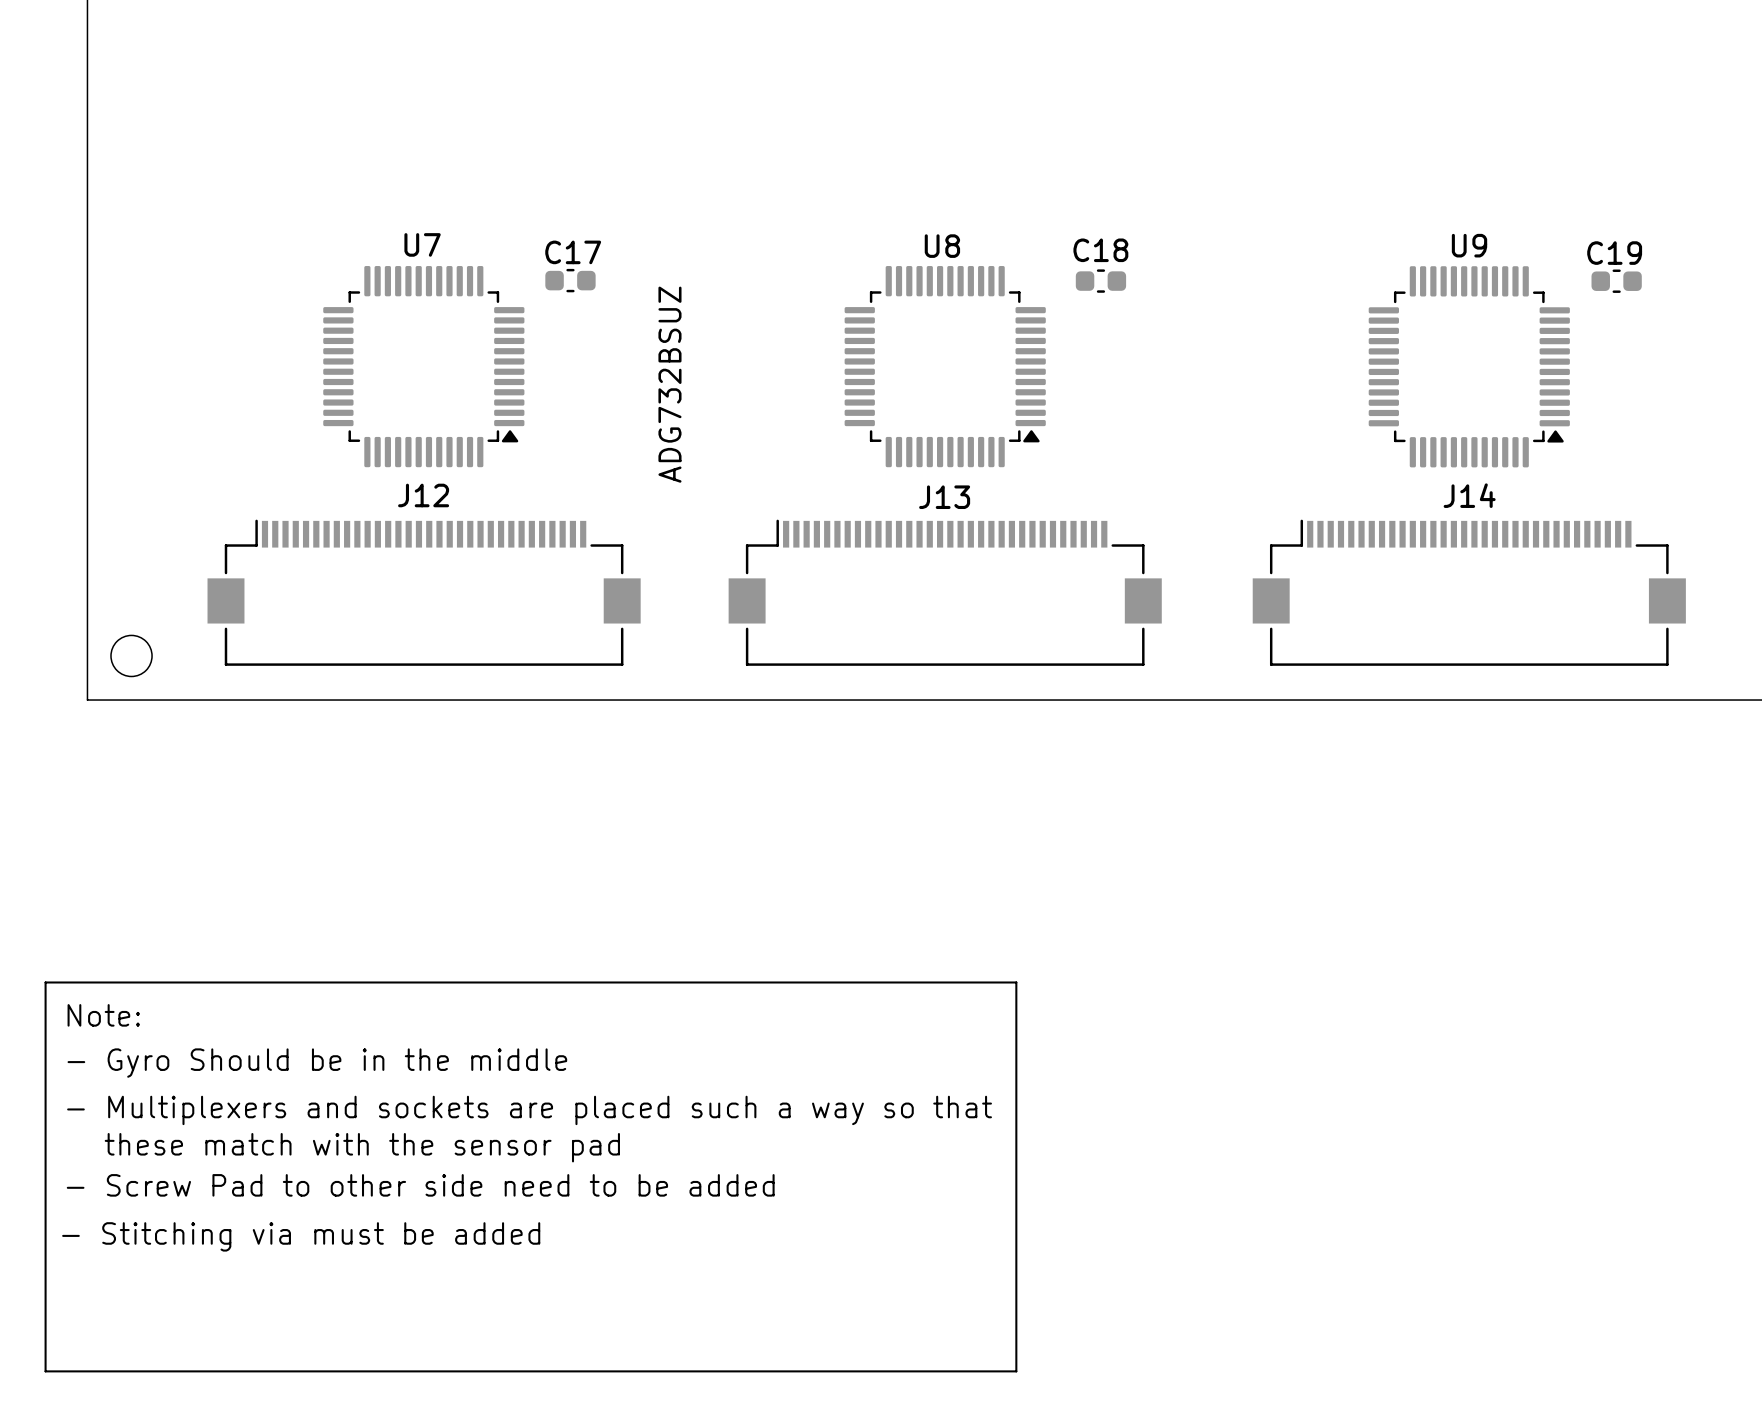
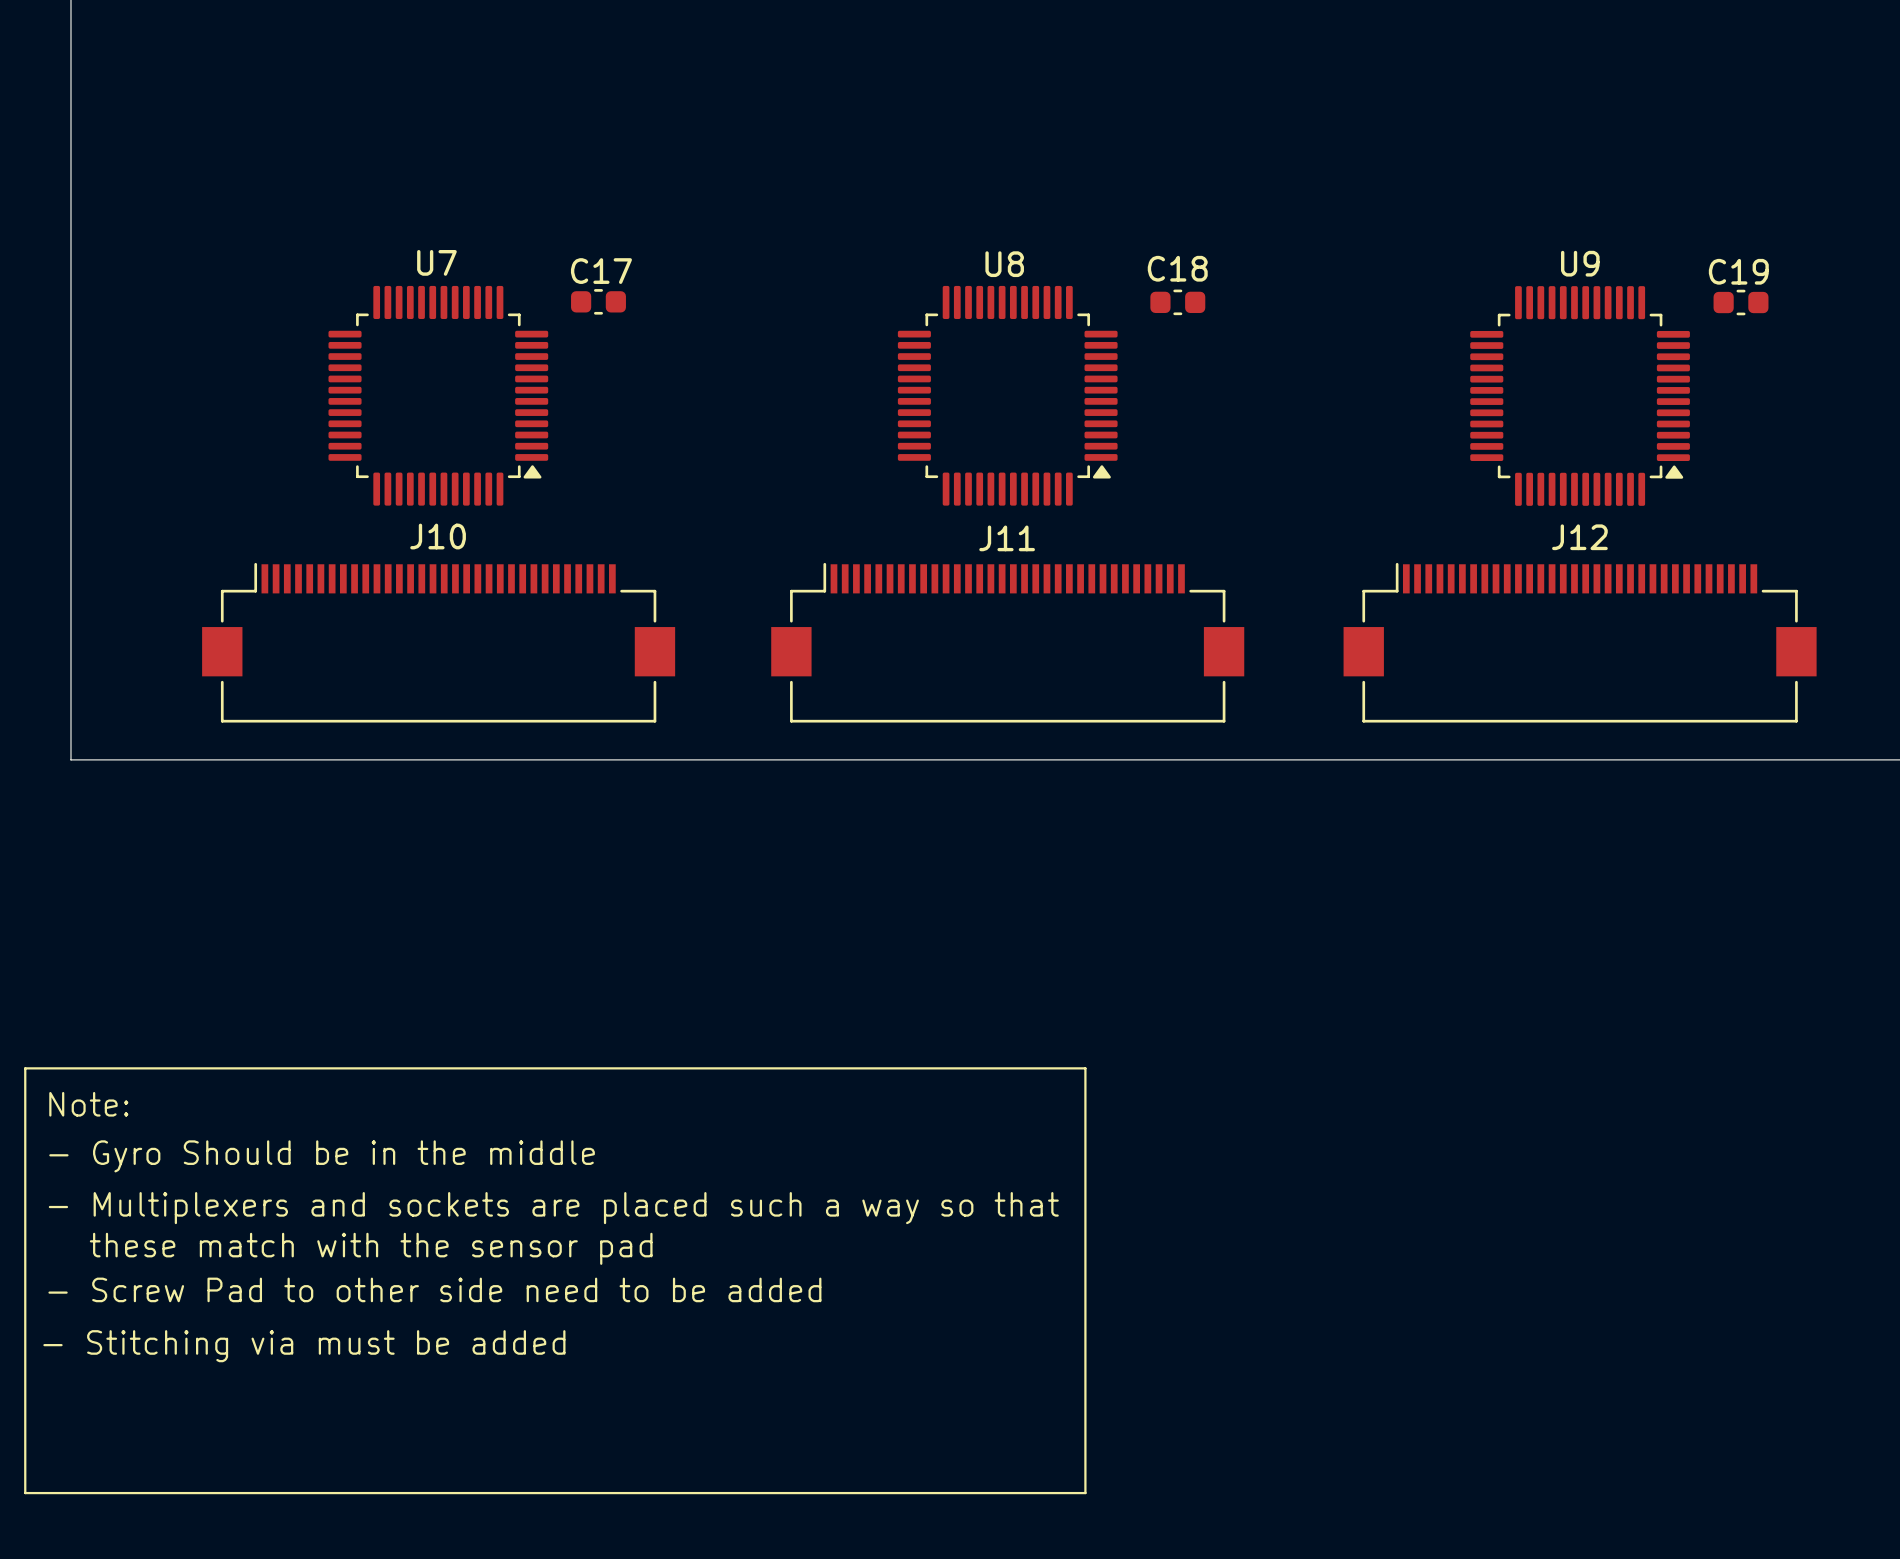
text: ADG732BSUZ (669, 384) -> none
J12 name: J12 (423, 495) -> J10 (438, 536)
J14 name: J14 (1469, 495) -> J12 (1579, 537)
J13 name: J13 (944, 497) -> J11 (1007, 538)
round board edge: [110, 634, 153, 678] -> none

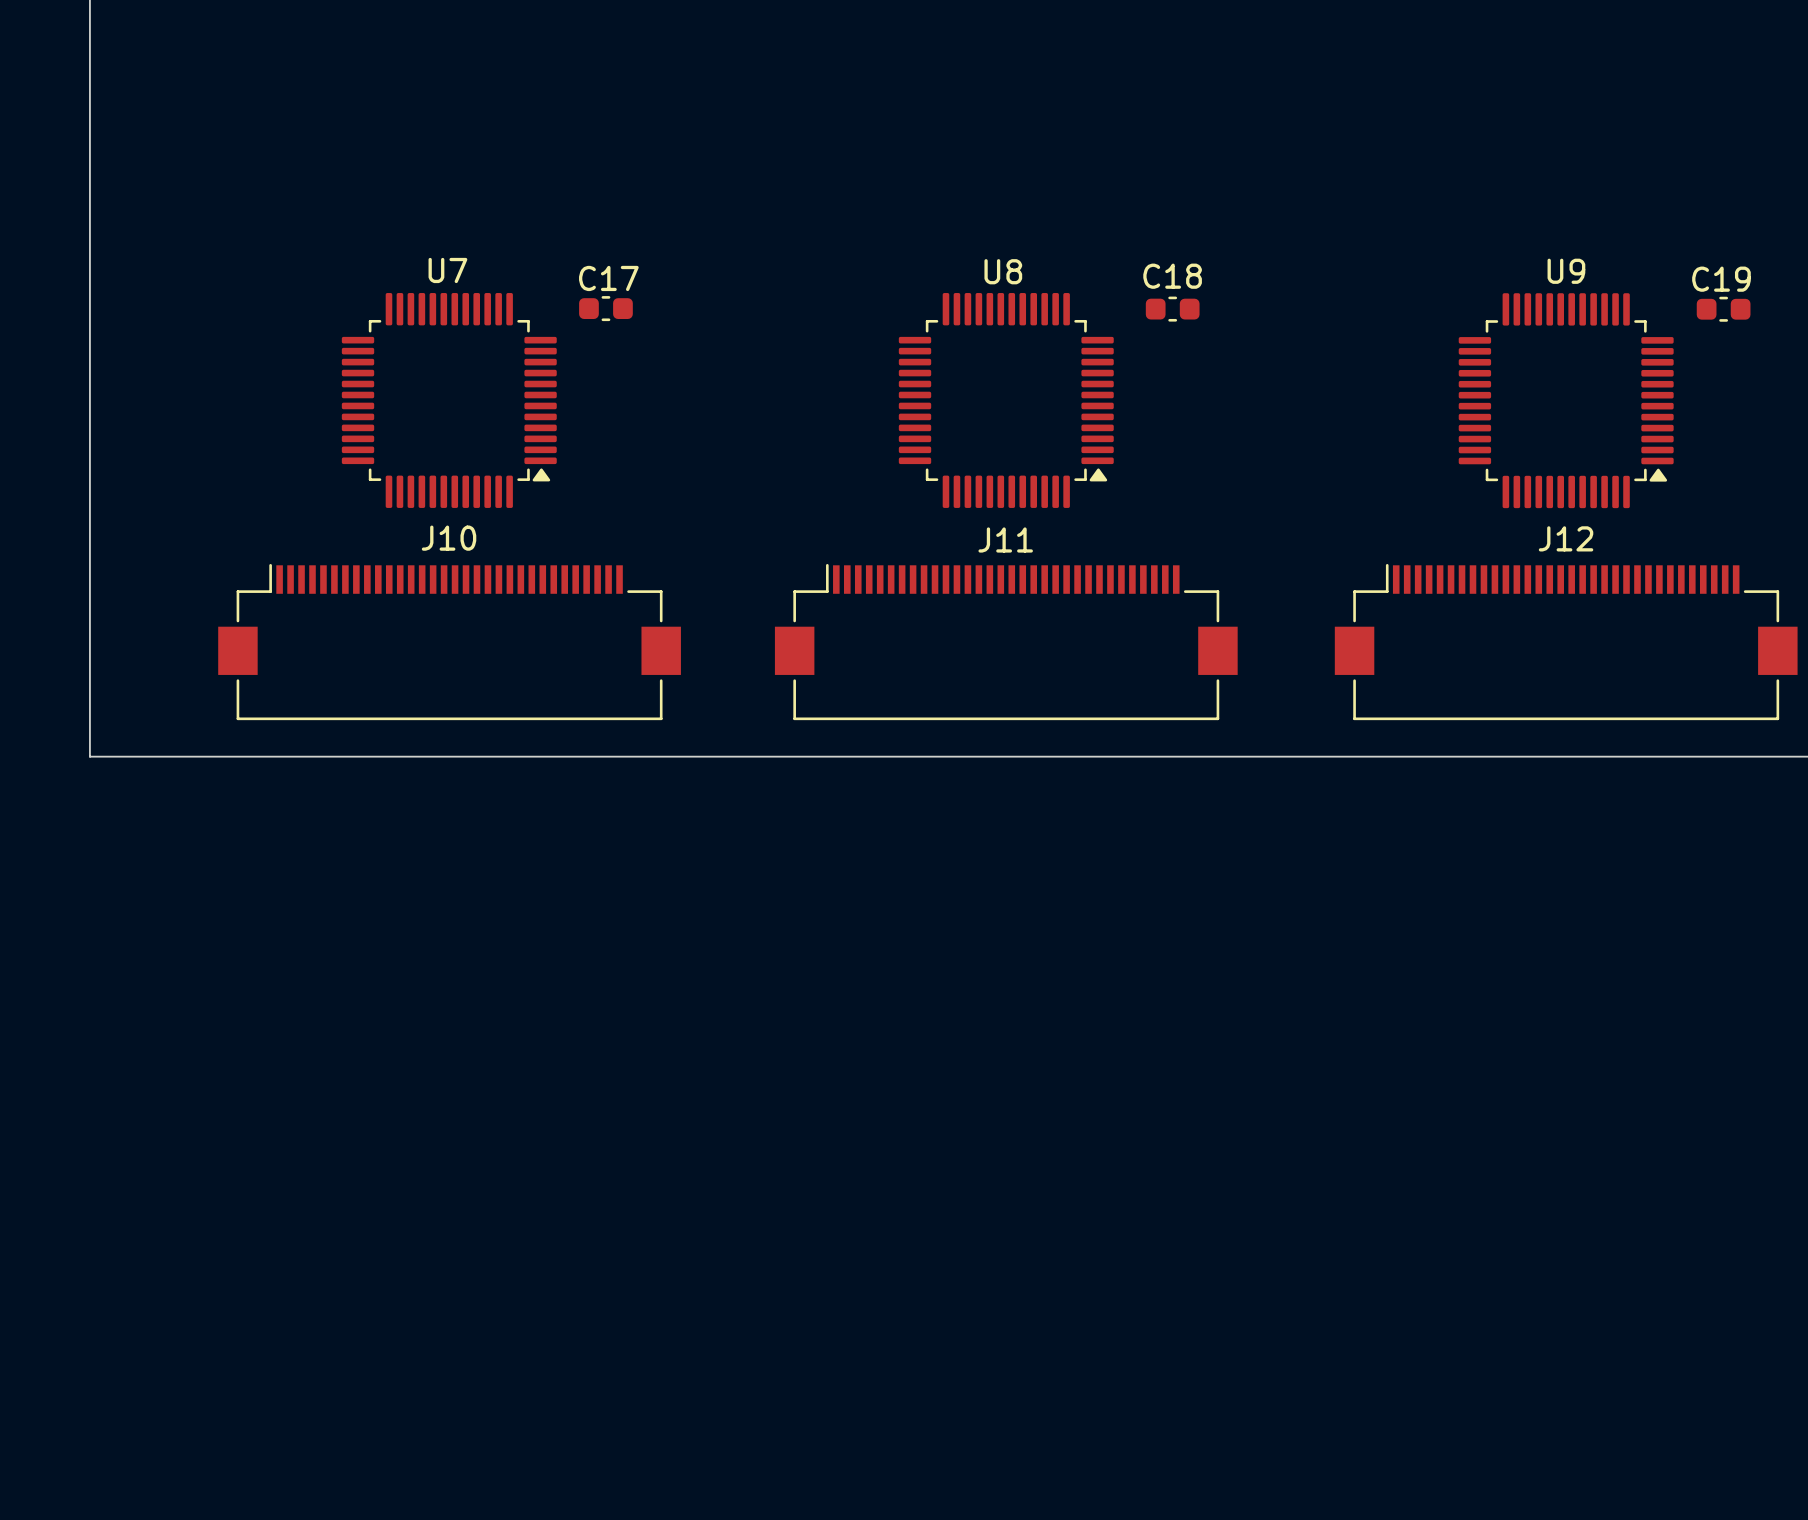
line: (25, 1068) (1085, 1068) (1085, 1493) (25, 1493) (25, 1068) -> none
text: Note: (88, 1104) -> none
text: - Gyro Should be in the middle (322, 1156) -> none
text: - Multiplexers and sockets are placed such a way so that (553, 1208) -> none
text: these match with the sensor pad (371, 1248) -> none
text: - Screw Pad to other side need to be added (434, 1289) -> none
text: - Stitching via must be added (304, 1346) -> none

